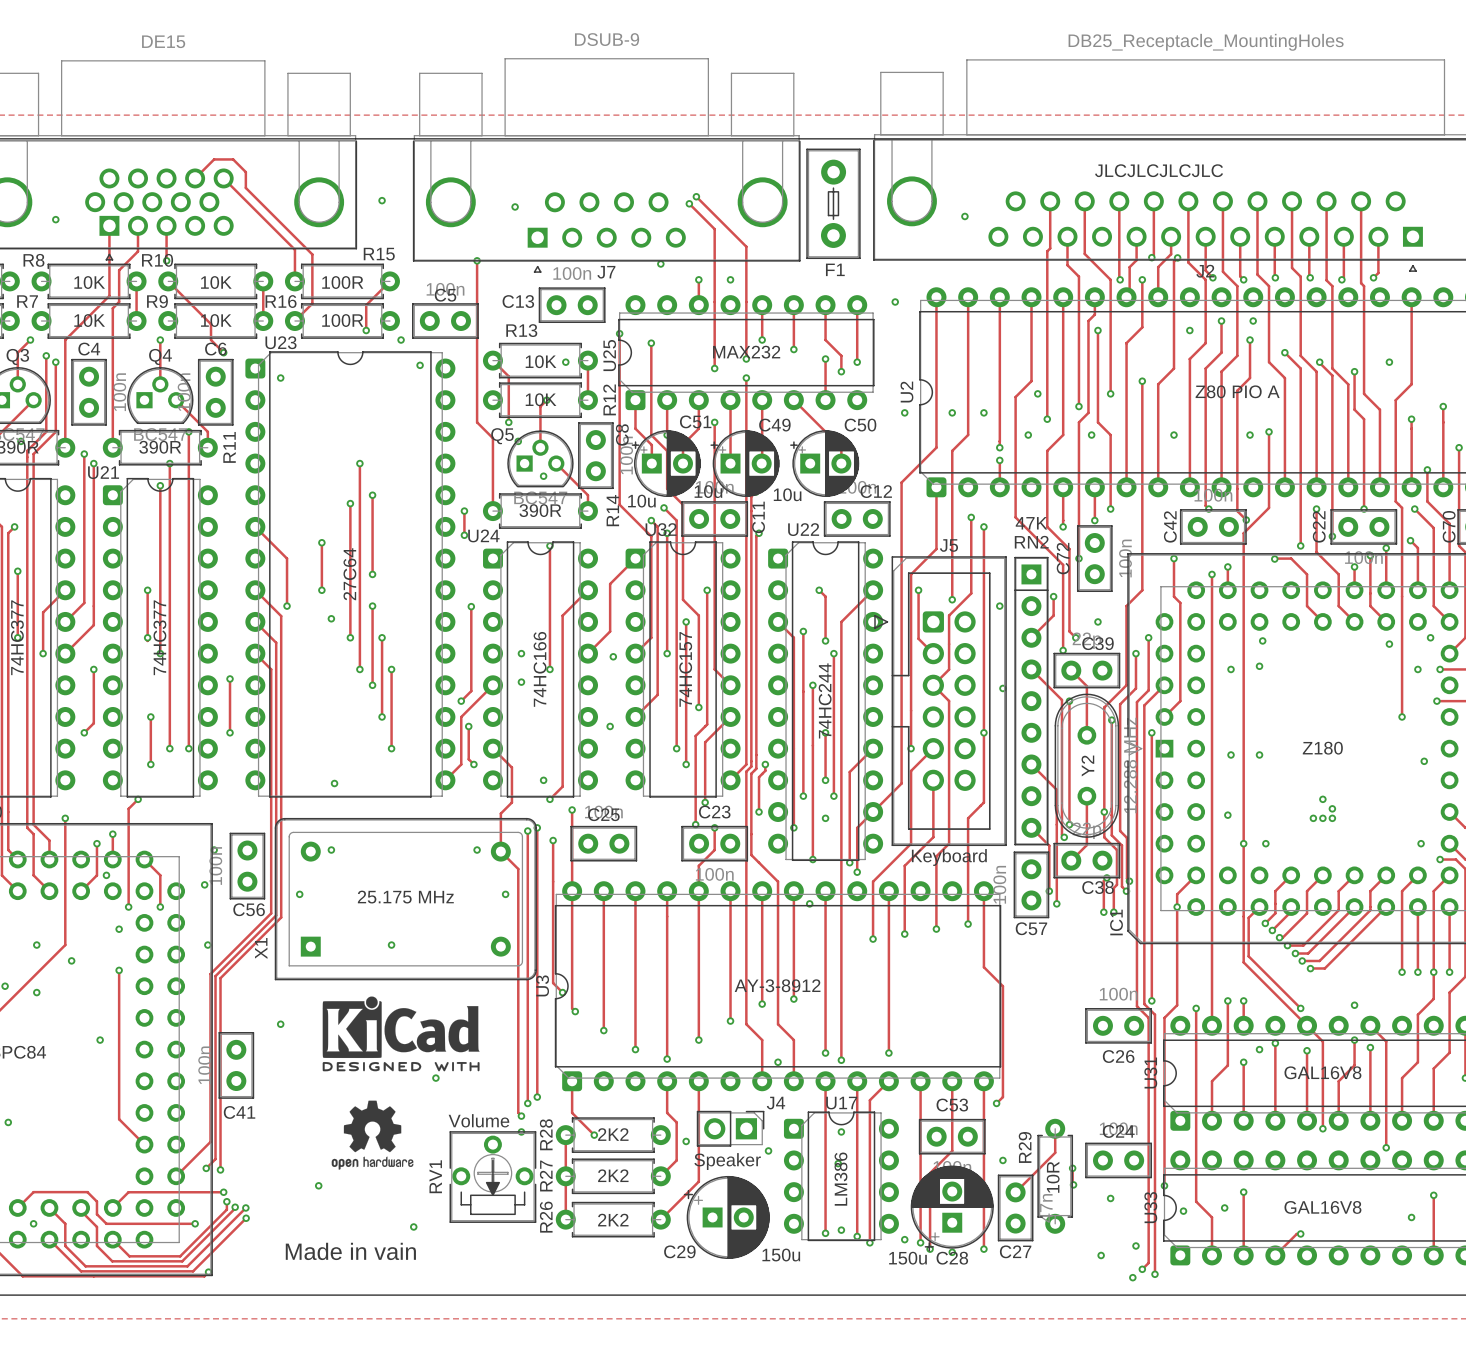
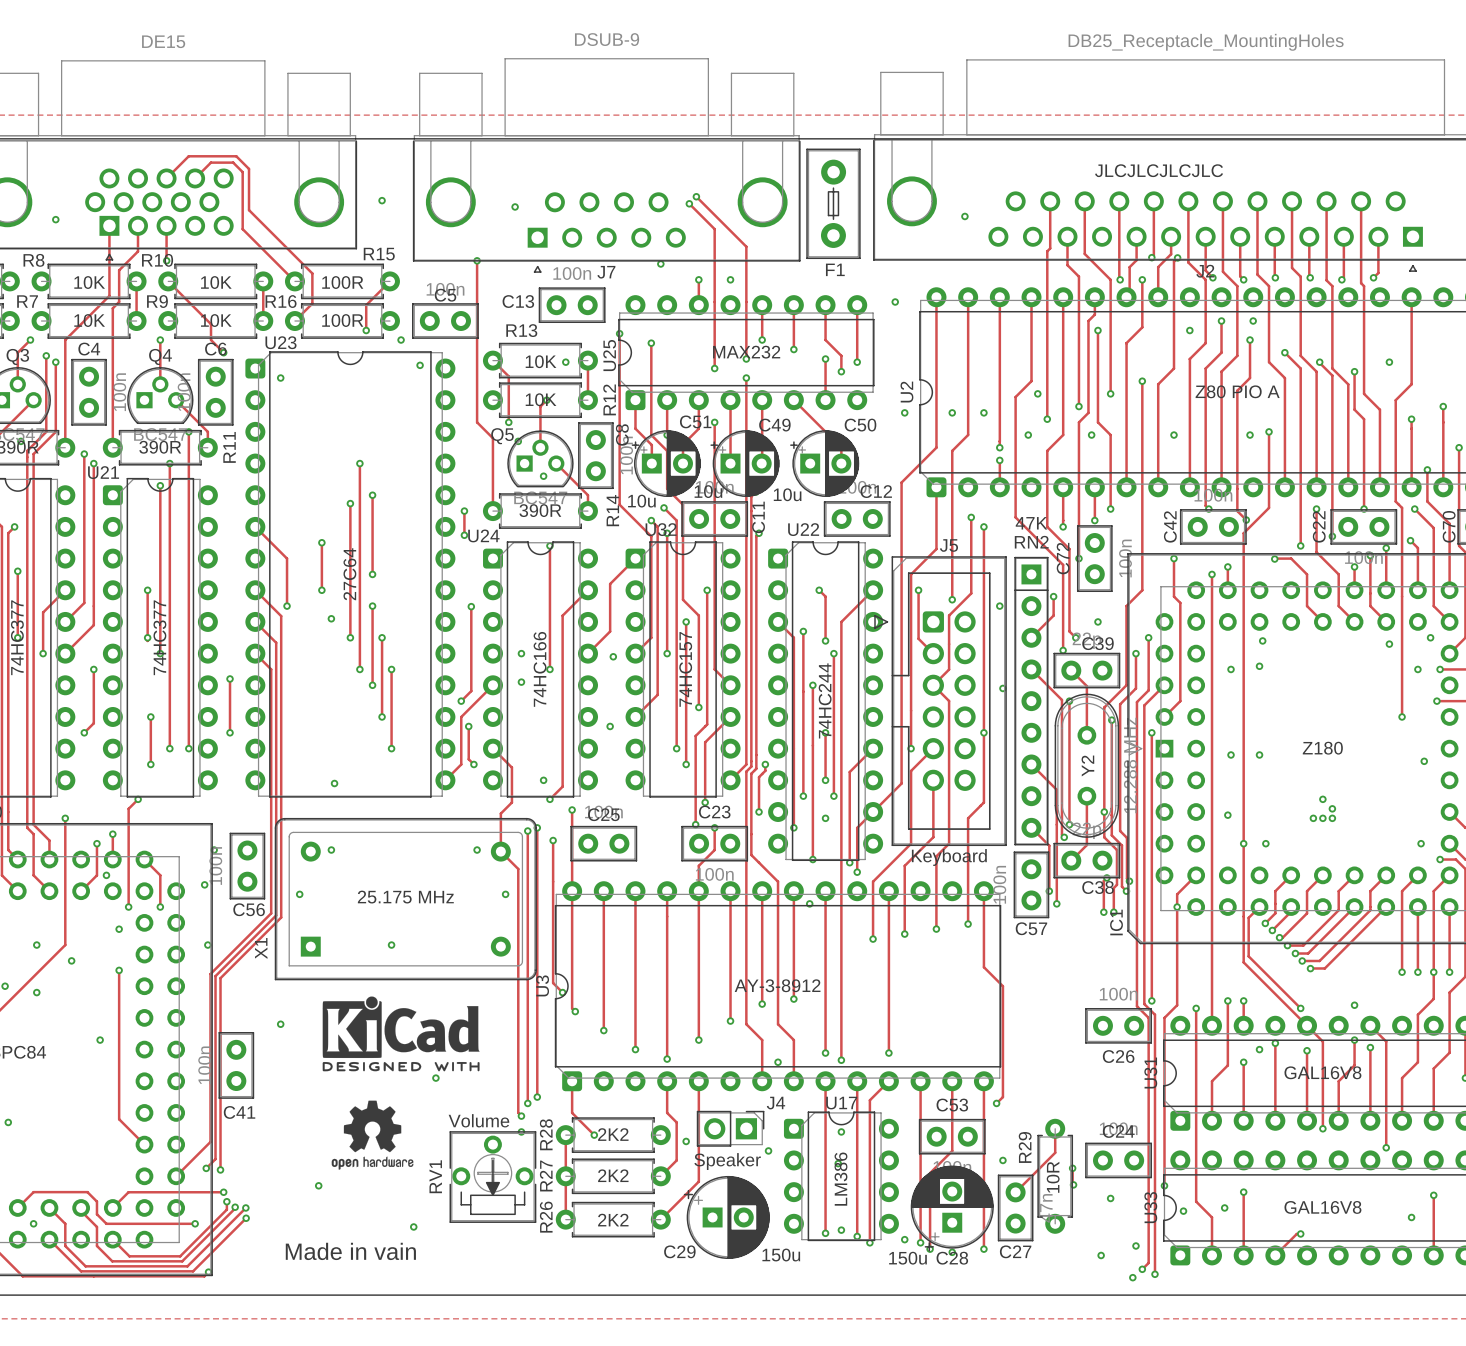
track: (210, 162) (214, 159) (233, 159) (245, 172) (245, 187) (312, 254) (312, 273) -> (210, 162) (233, 162) (242, 172) (242, 229) (294, 281)
track: none -> (166, 178) (188, 156) (236, 156) (249, 168) (249, 210) (312, 273)
track: (223, 178) (294, 249) (294, 281) -> none

